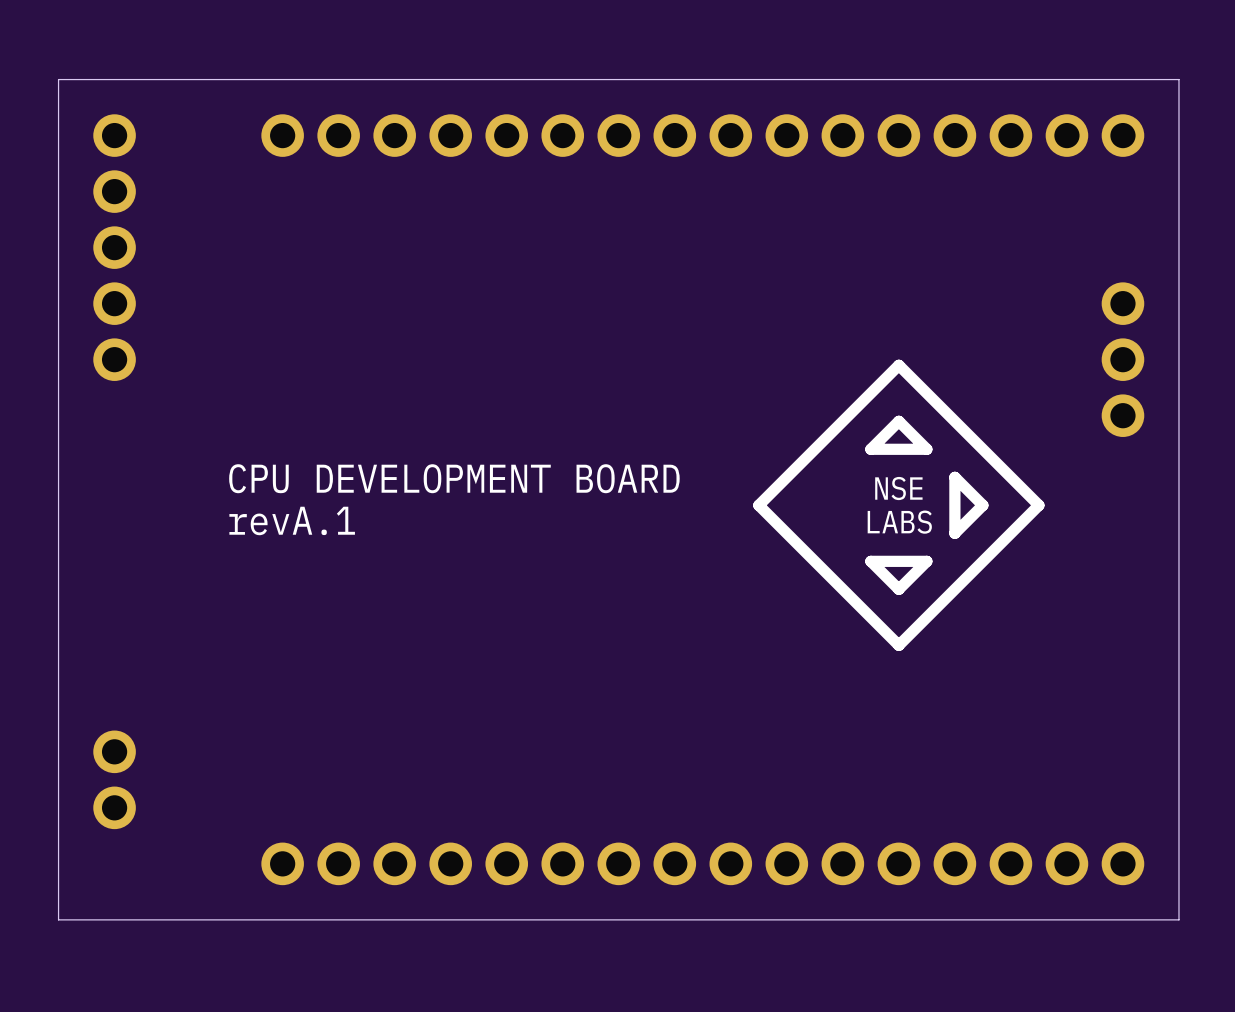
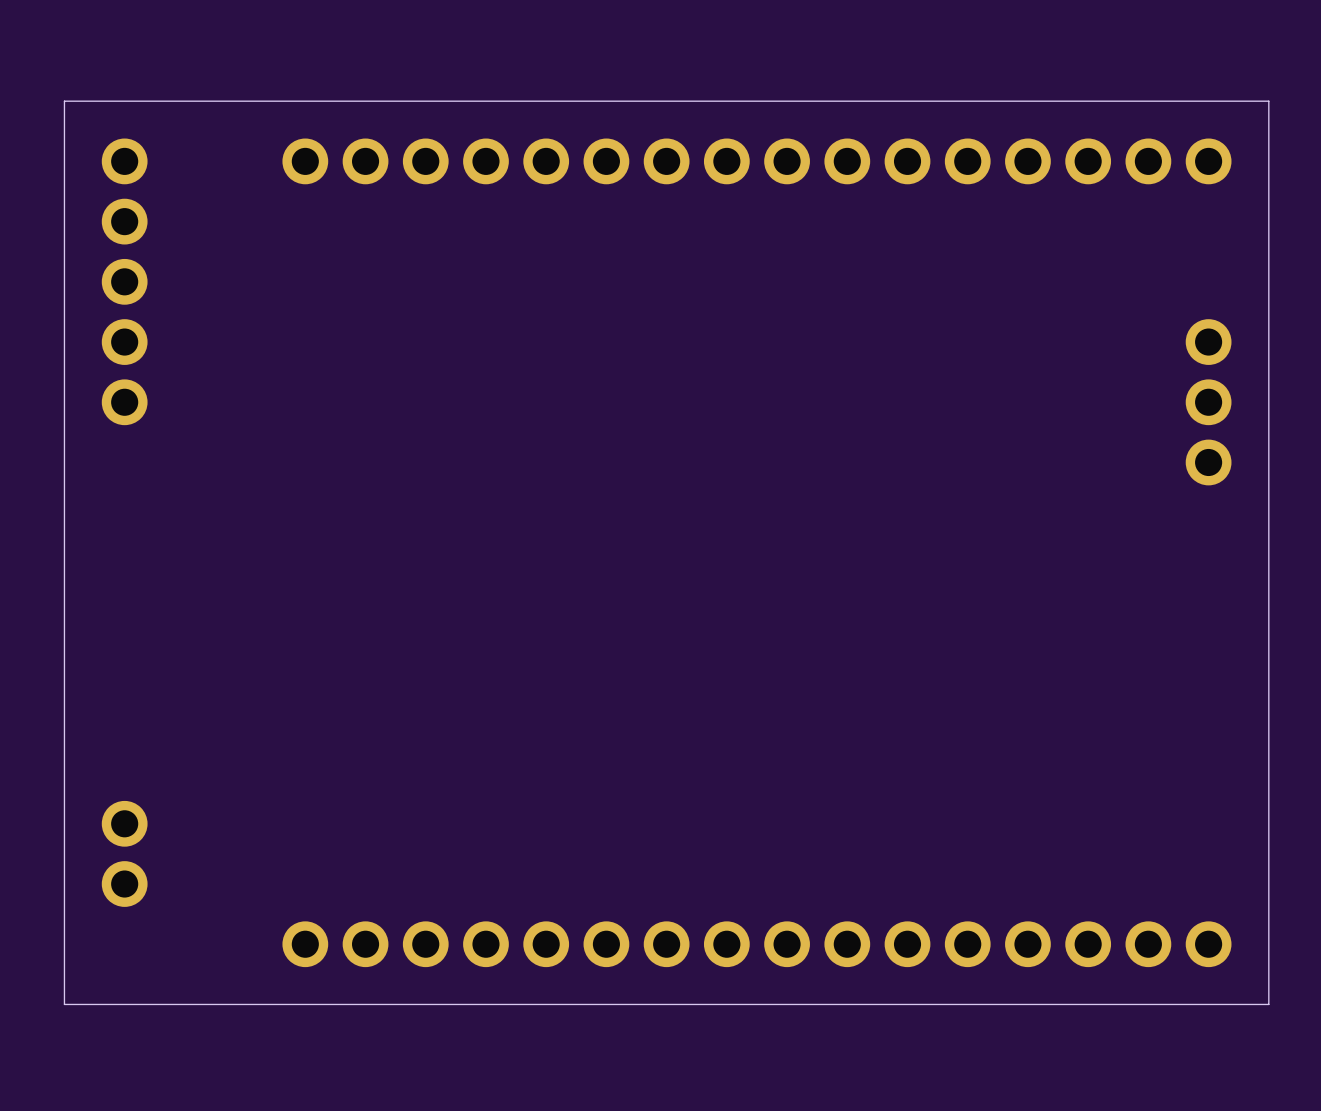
line: (898, 365) (758, 505) (898, 645) (1038, 505) (898, 365) -> none
line: (898, 421) (870, 449) (926, 449) (898, 421) -> none
line: (954, 477) (982, 505) (954, 533) (954, 477) -> none
text: CPU DEVELOPMENT BOARD (454, 478) -> none
text: NSE (898, 488) -> none
text: revA.1 (292, 520) -> none
text: LABS (899, 522) -> none
line: (926, 561) (898, 589) (870, 561) (926, 561) -> none

